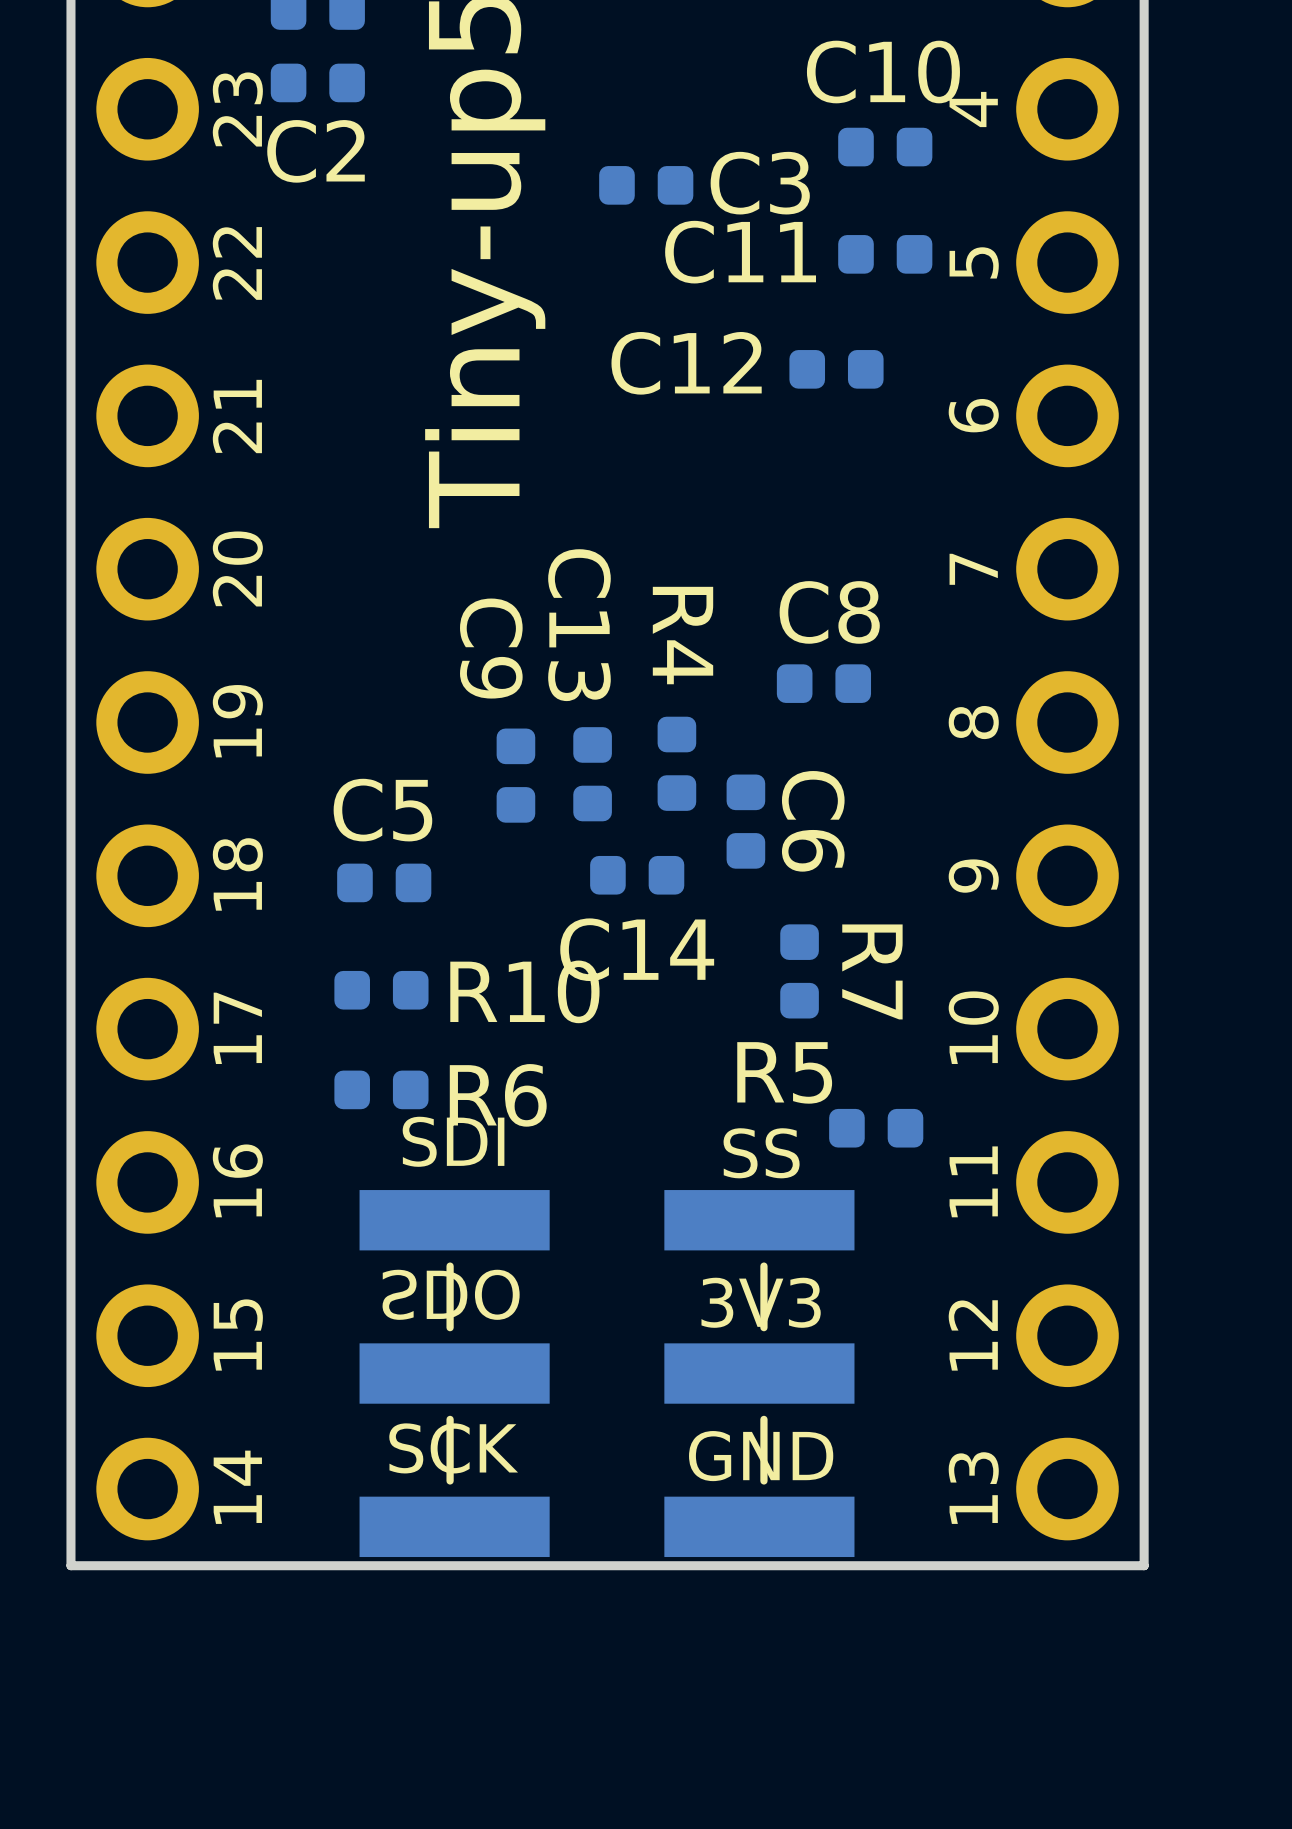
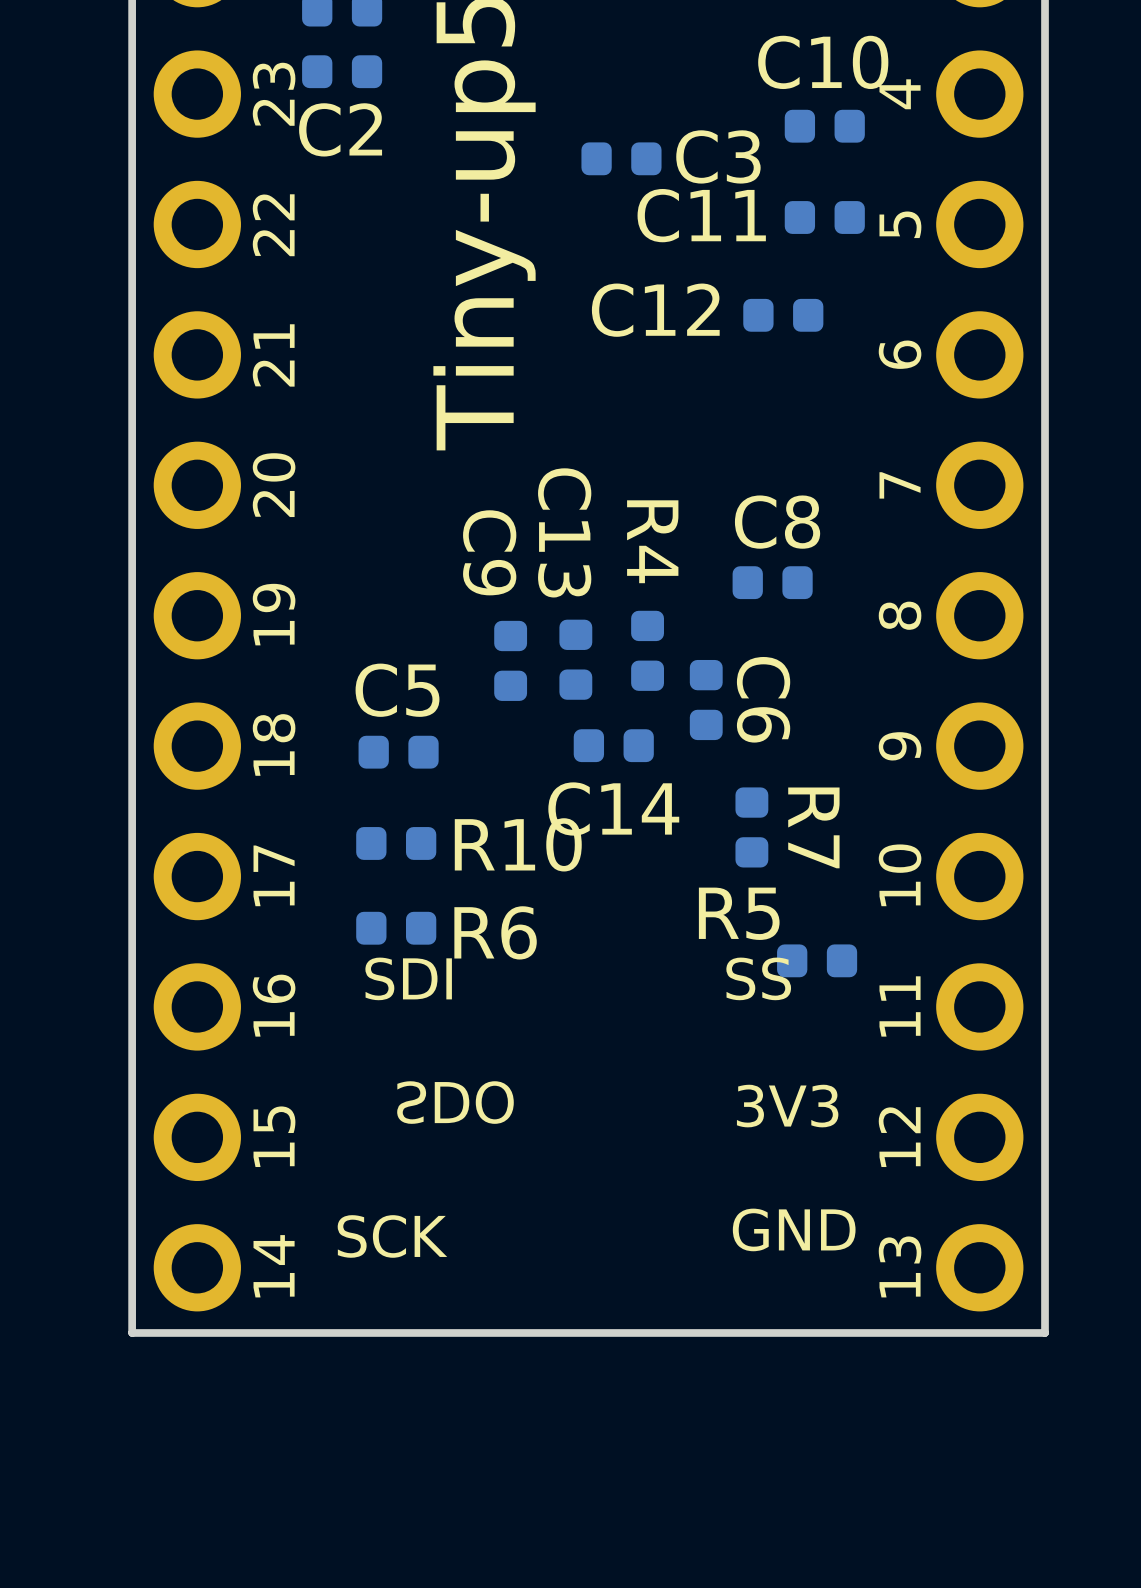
text position: SDI (453, 1141) -> SDI (408, 978)
text position: SS (761, 1153) -> SS (758, 978)
text position: 3V3 (761, 1302) -> 3V3 (787, 1106)
part: (607, 1373) -> none
text position: SCK (453, 1448) -> SCK (392, 1236)
text position: GND (761, 1456) -> GND (794, 1229)

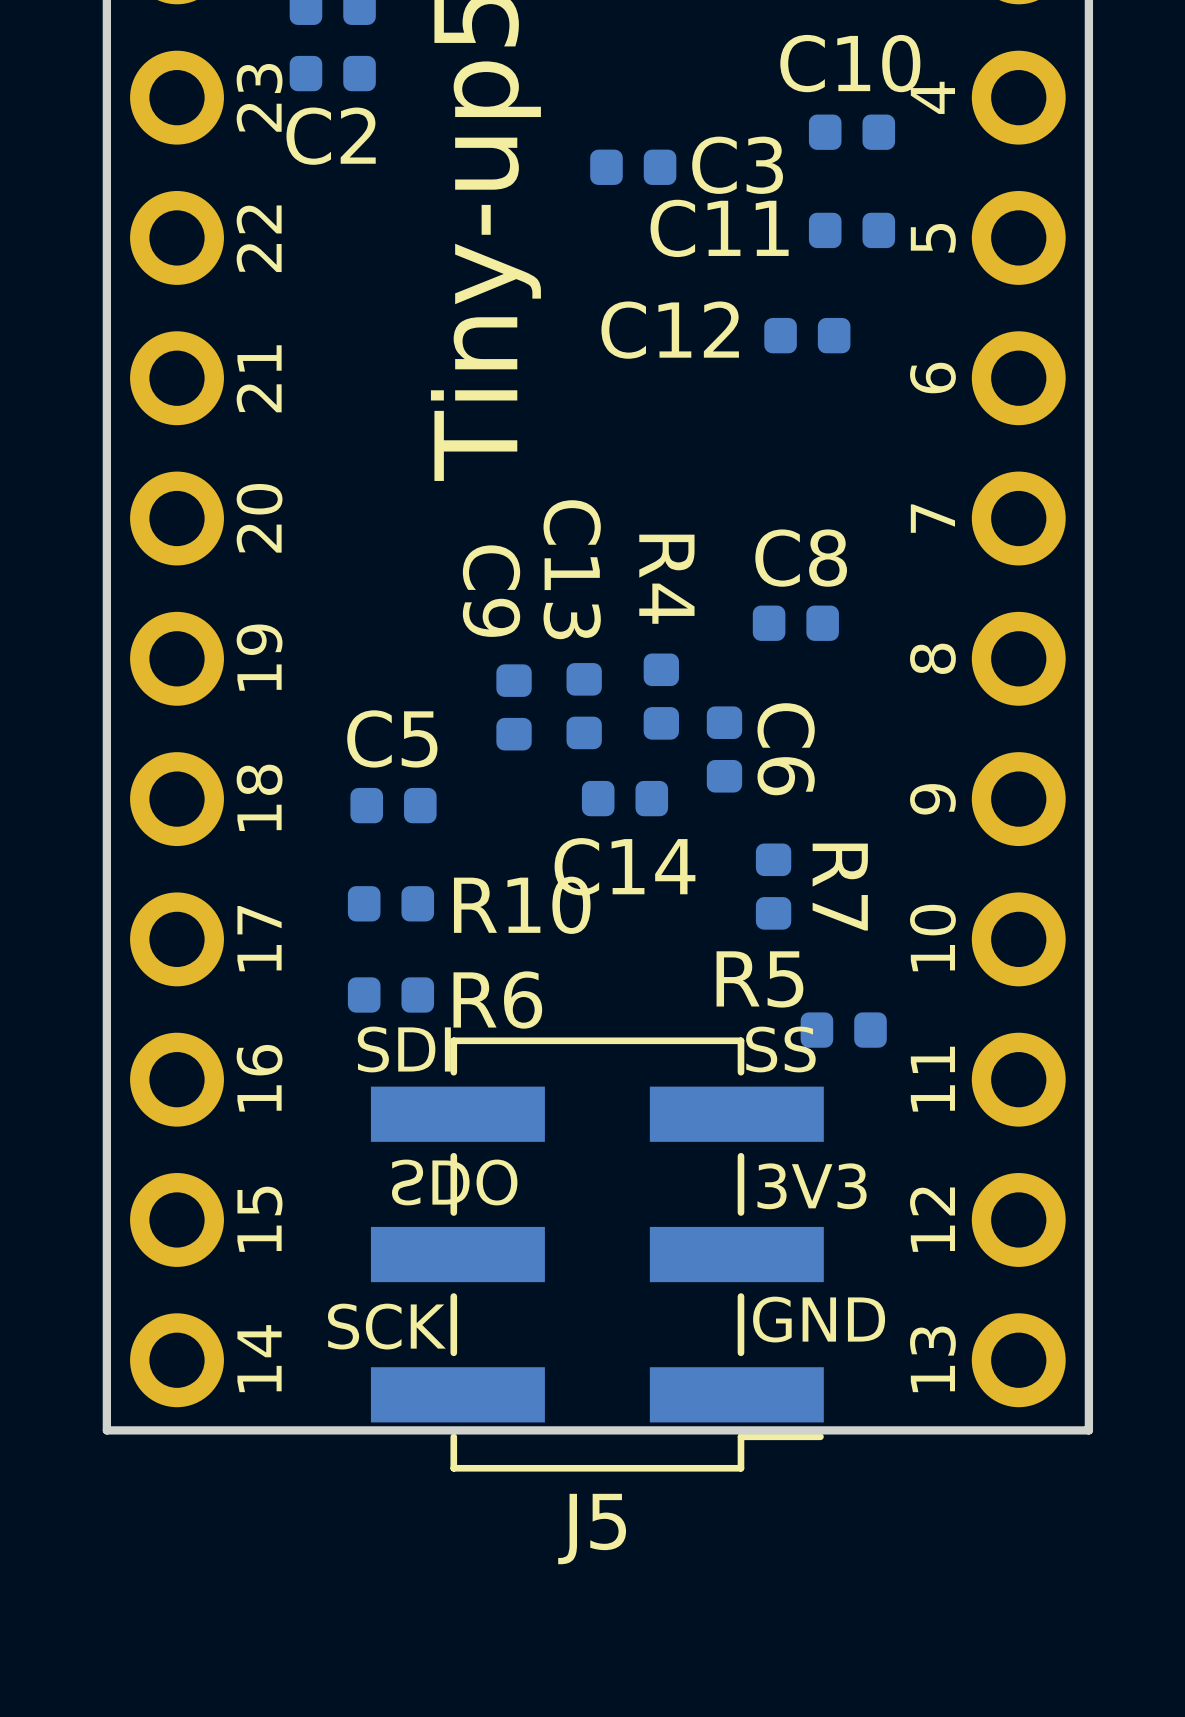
J5: none -> (597, 1254)

